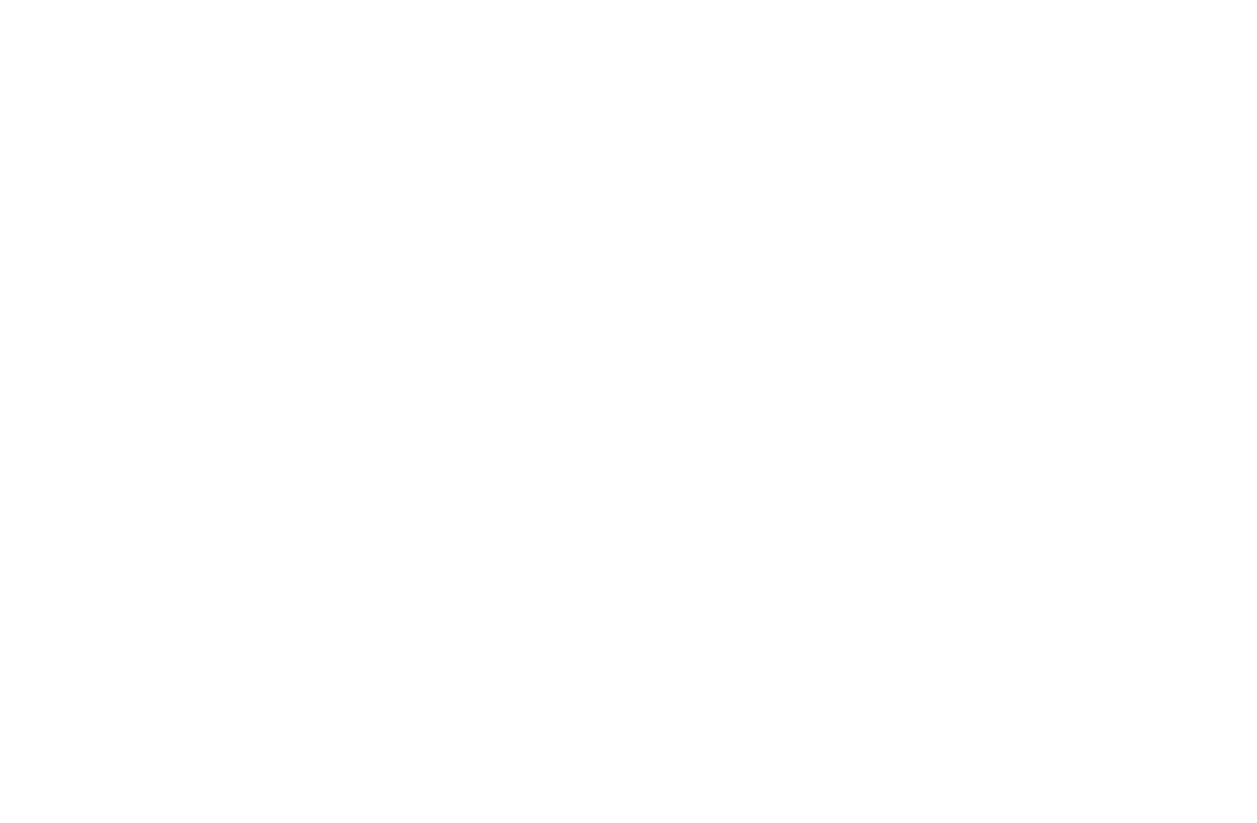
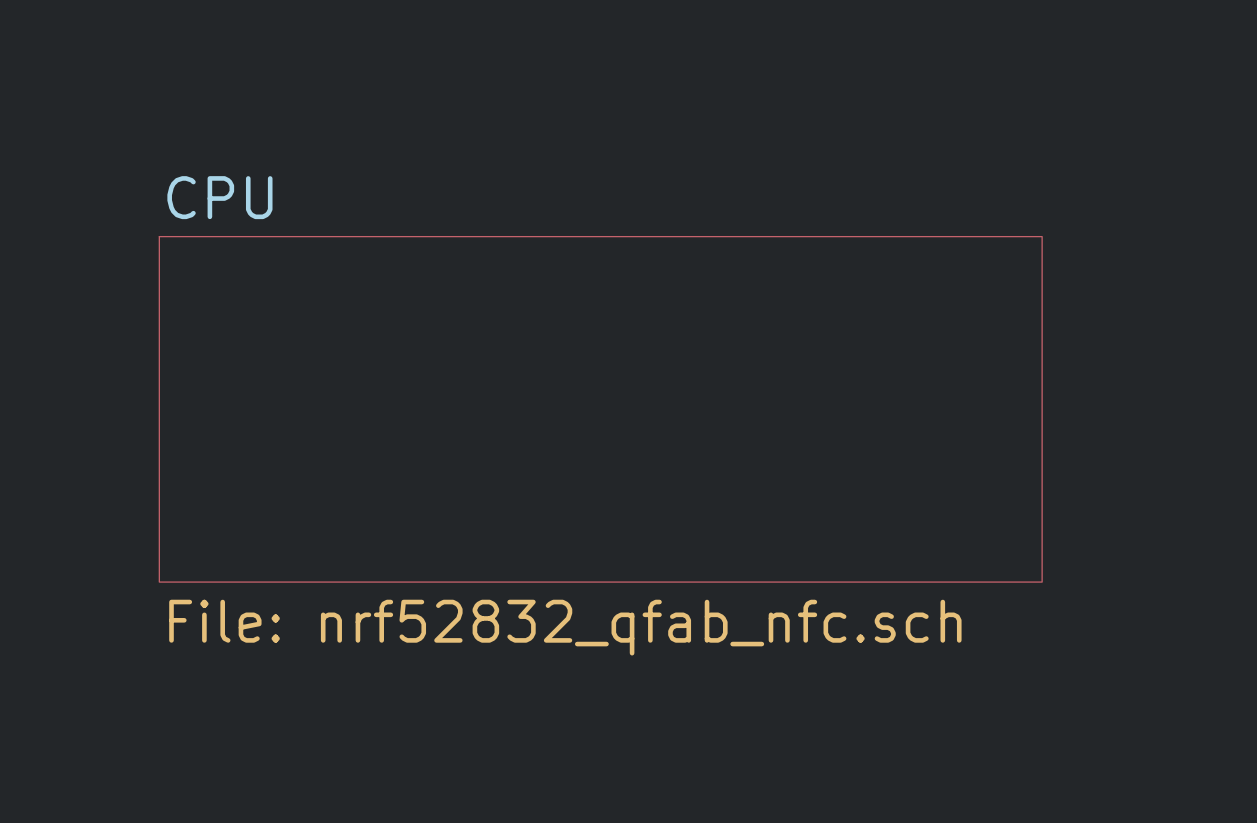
sheet CPU: none -> File: nrf52832_qfab_nfc.sch (600, 409)

